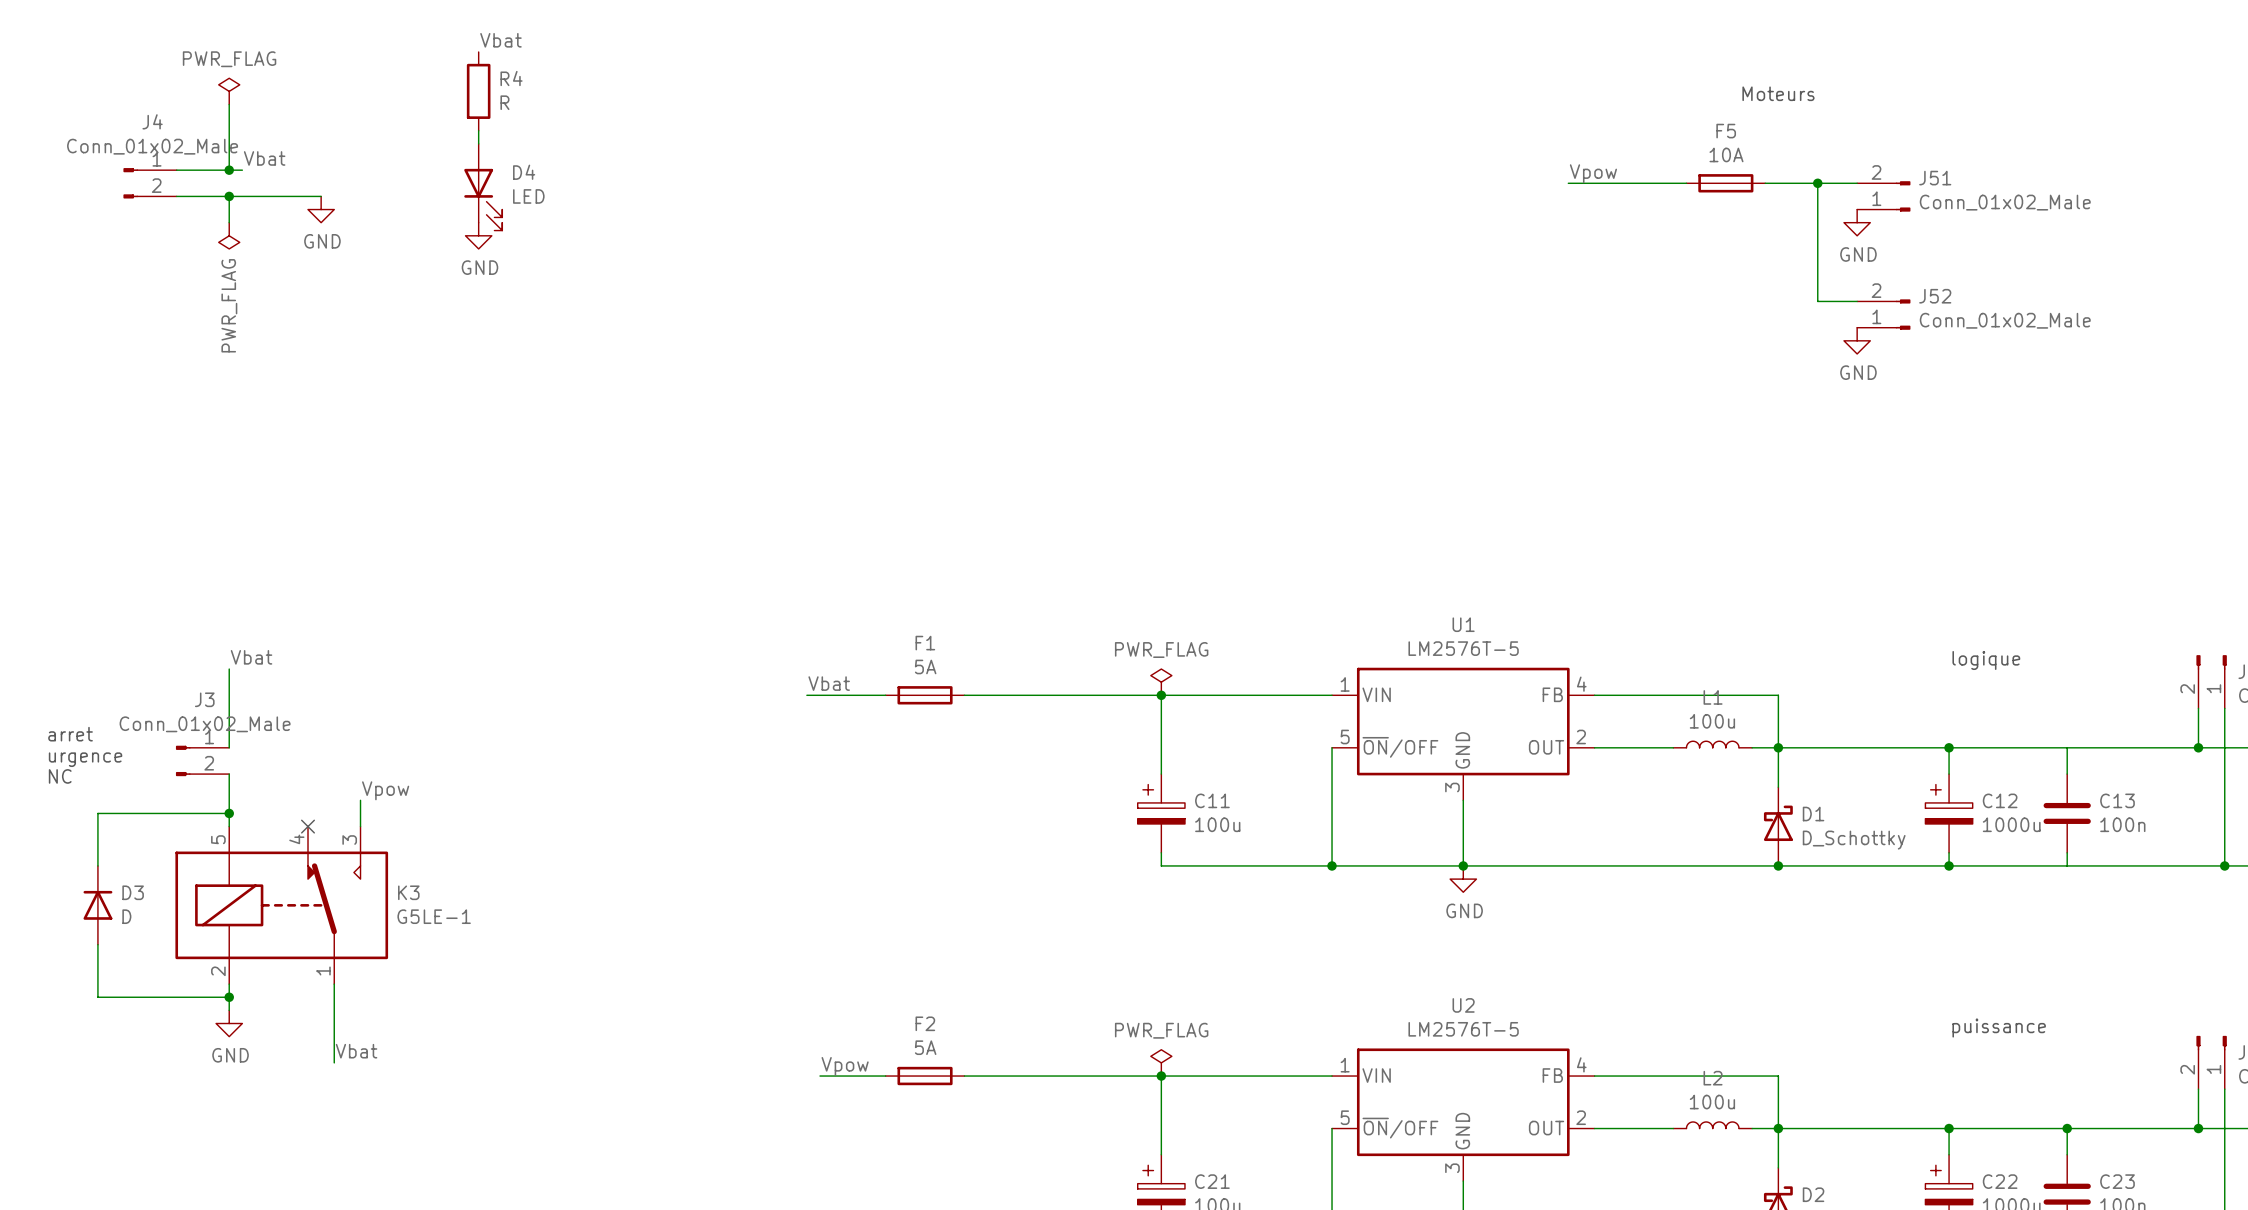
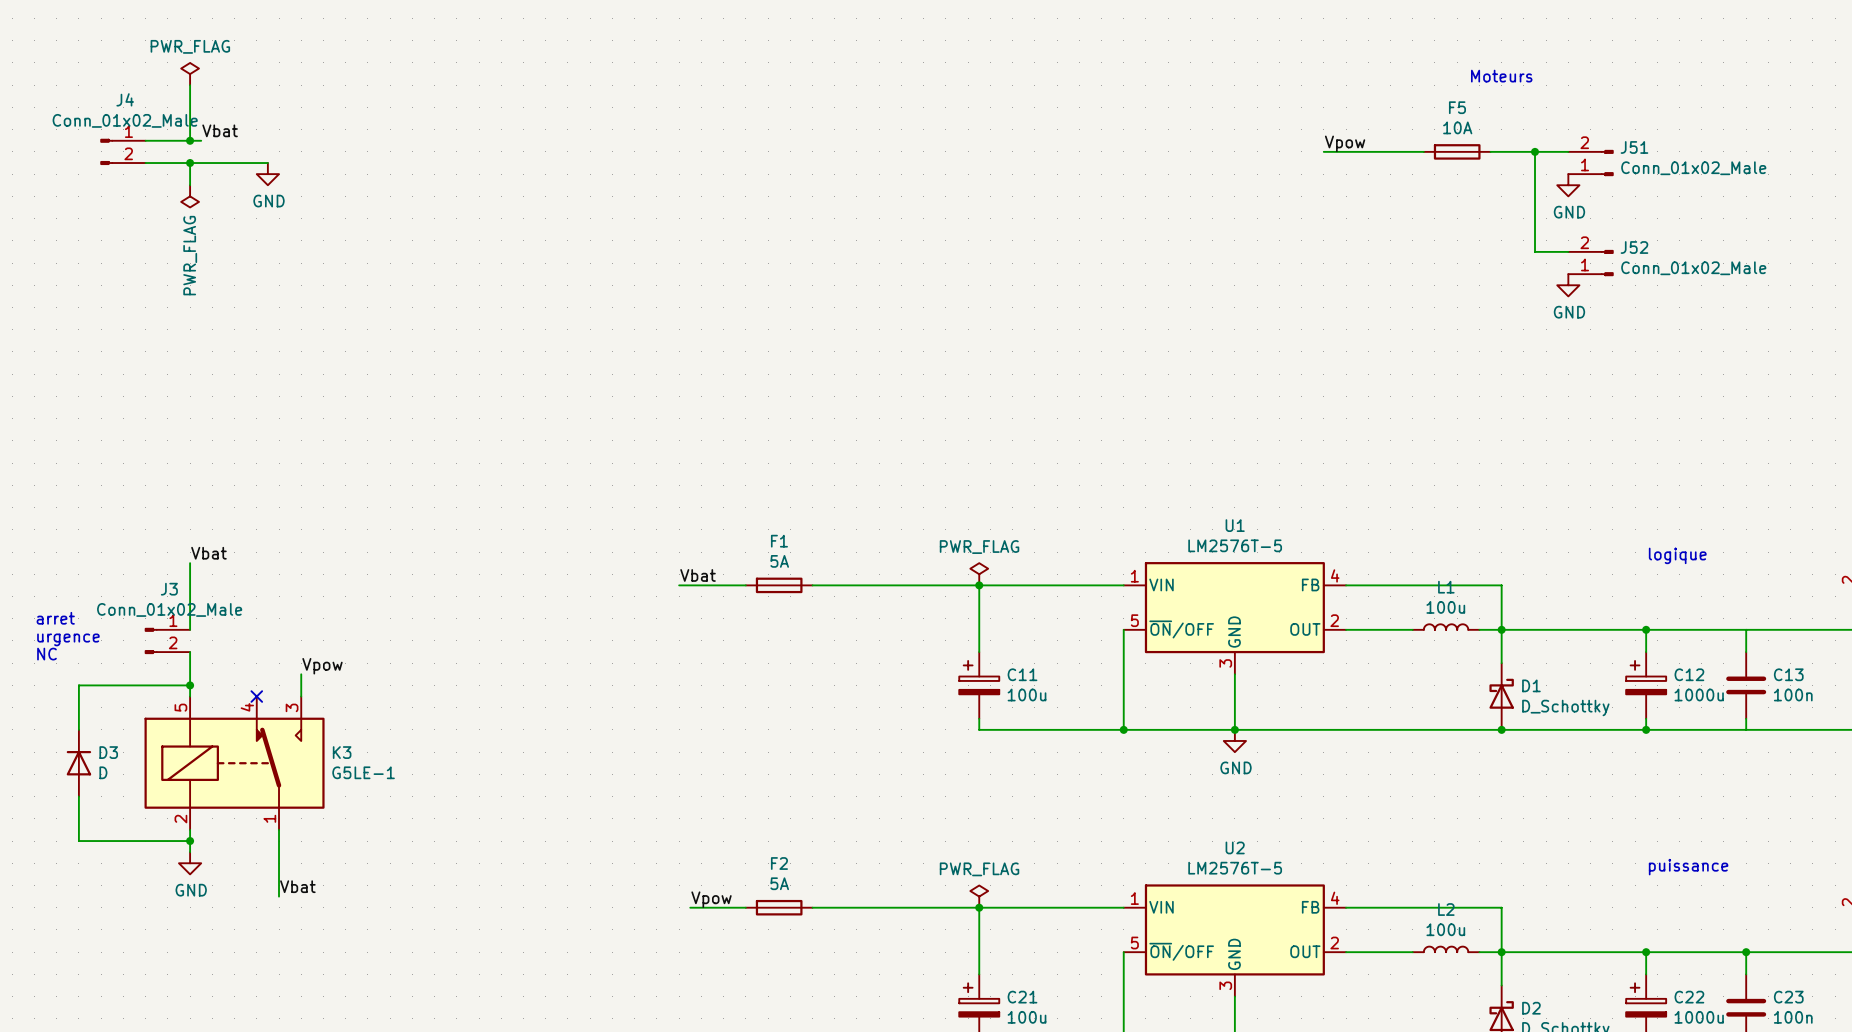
label: Vbat (500, 40) -> none
R4: R (478, 91) -> none
wire: (478, 130) (478, 143) -> none
D4: LED (483, 187) -> none
power symbol: GND (478, 235) -> none

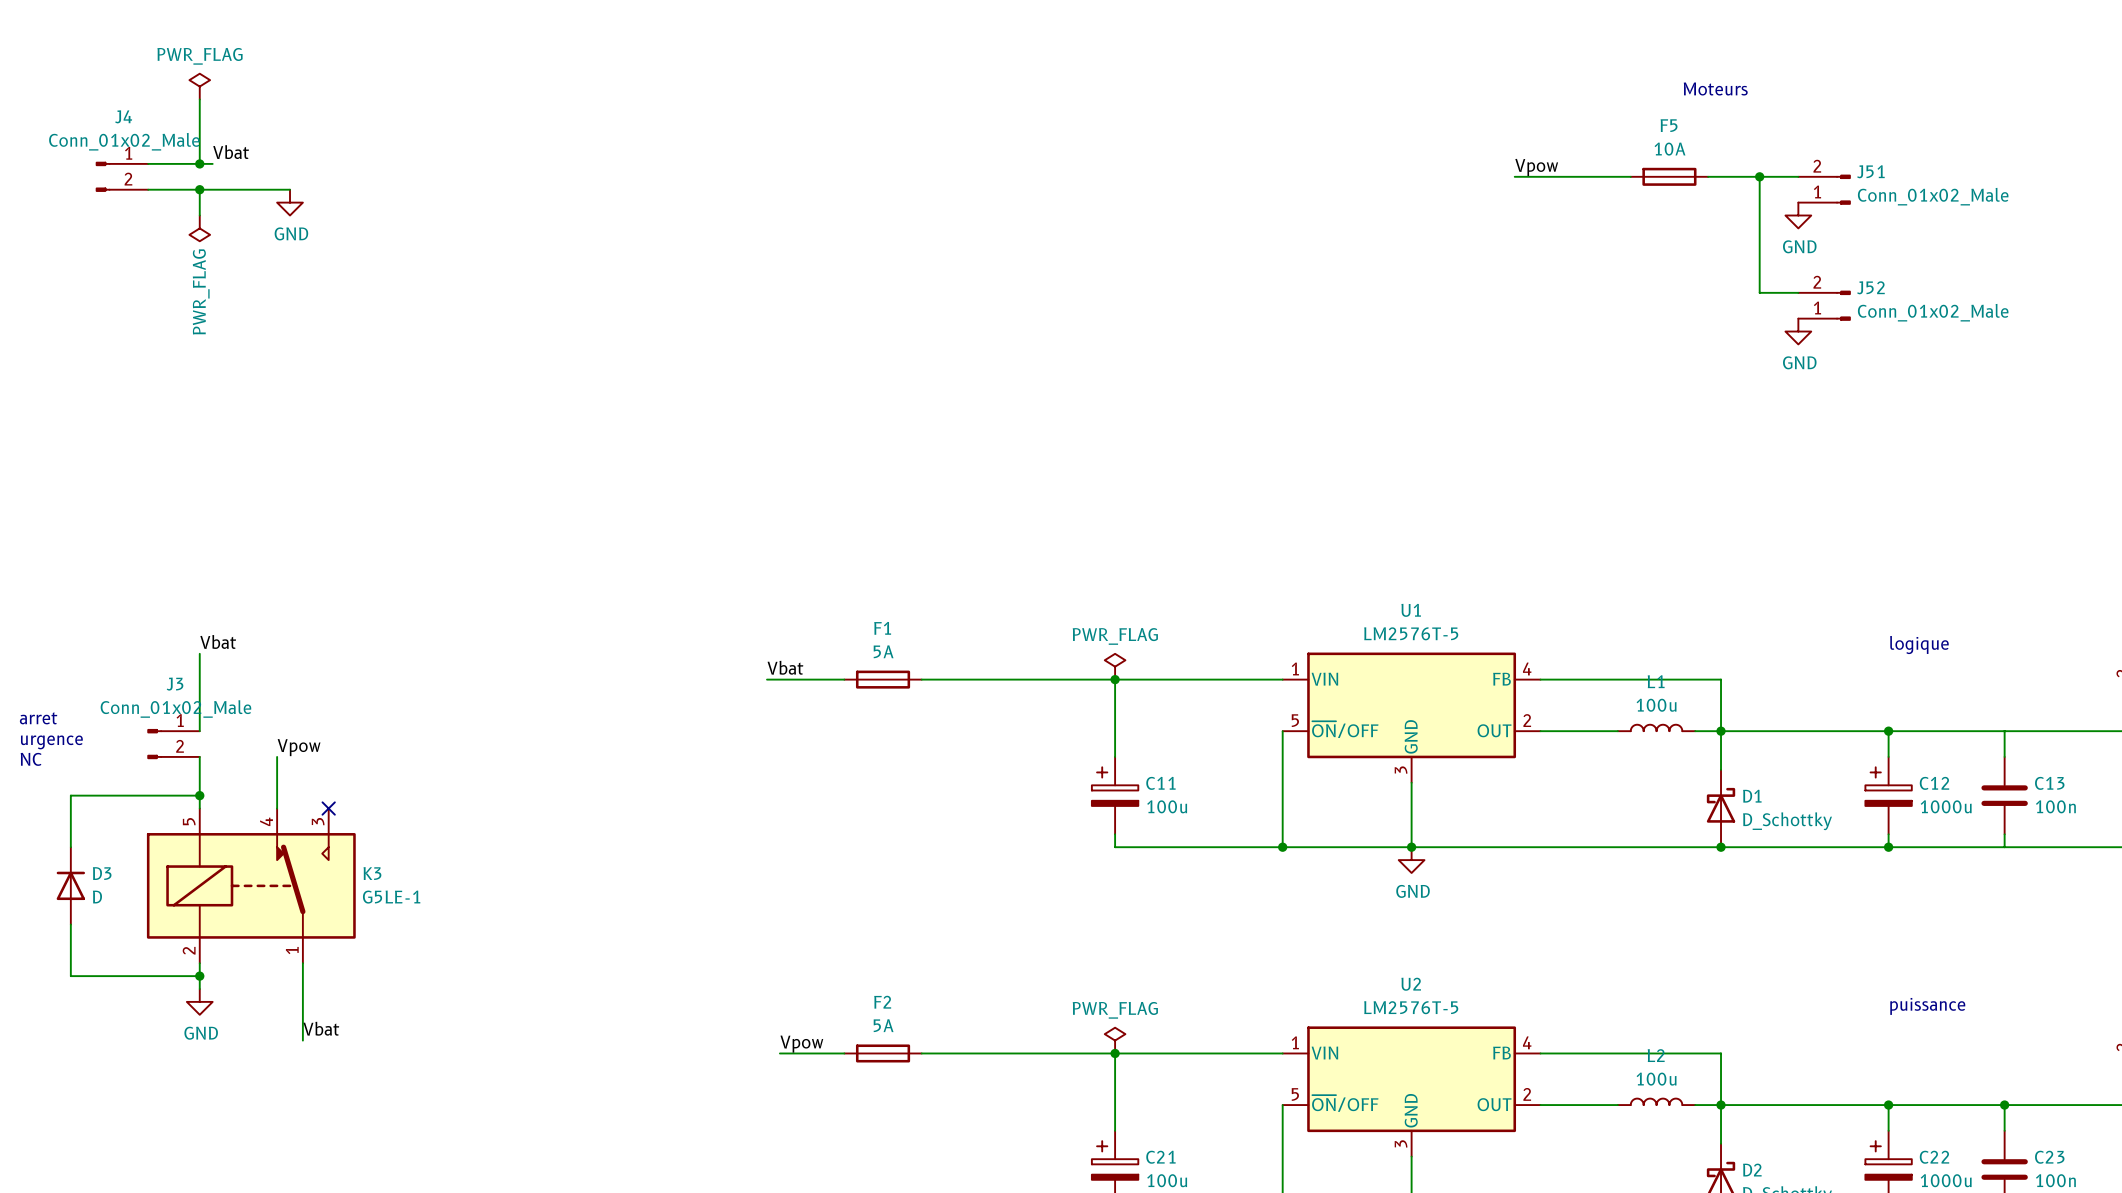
wire: none -> (277, 756) (277, 808)
label position: Vpow (322, 666) -> Vpow (299, 747)
wire: (301, 674) (301, 696) -> none
no-connect mark position: (256, 696) -> (328, 808)

